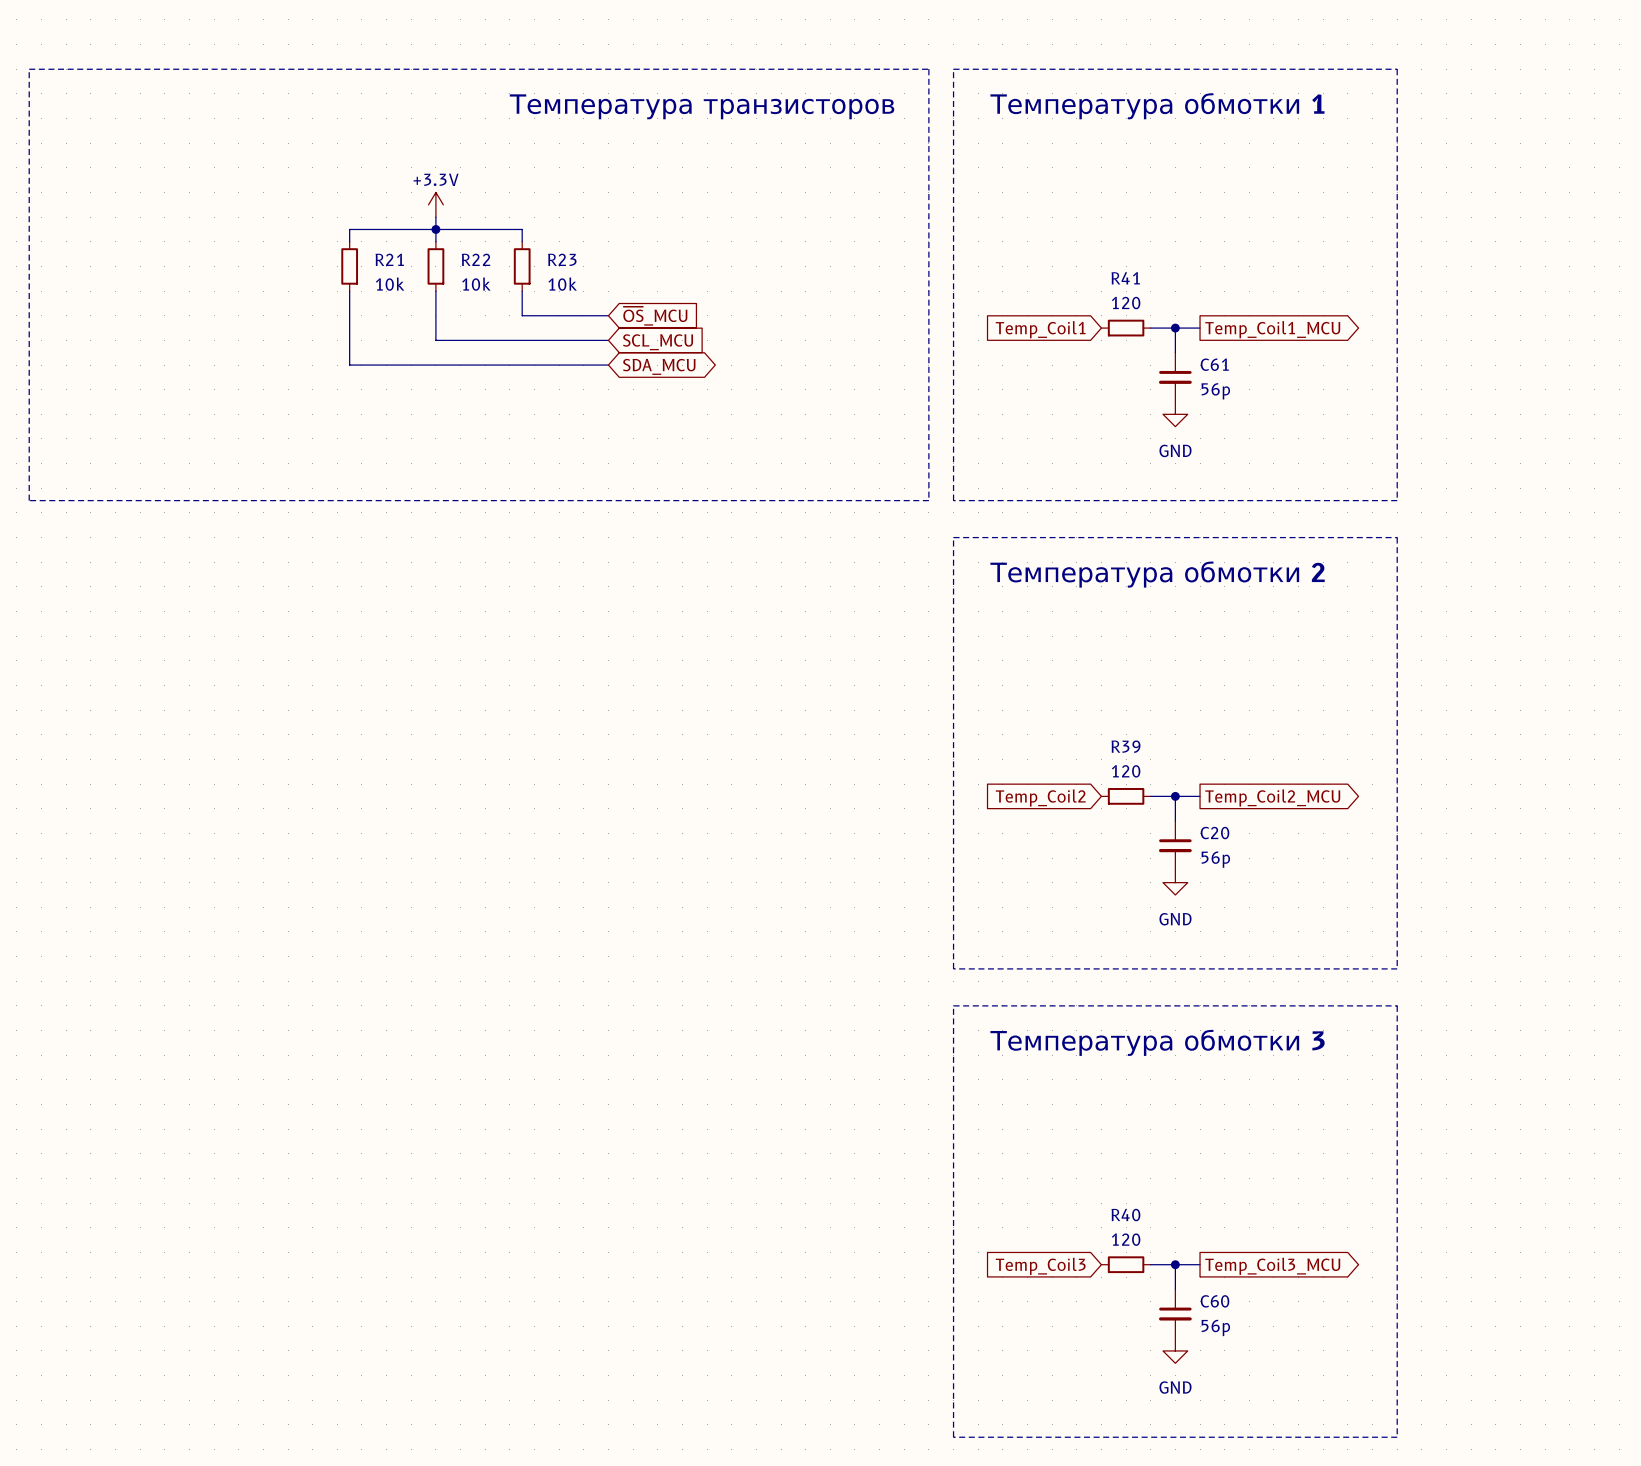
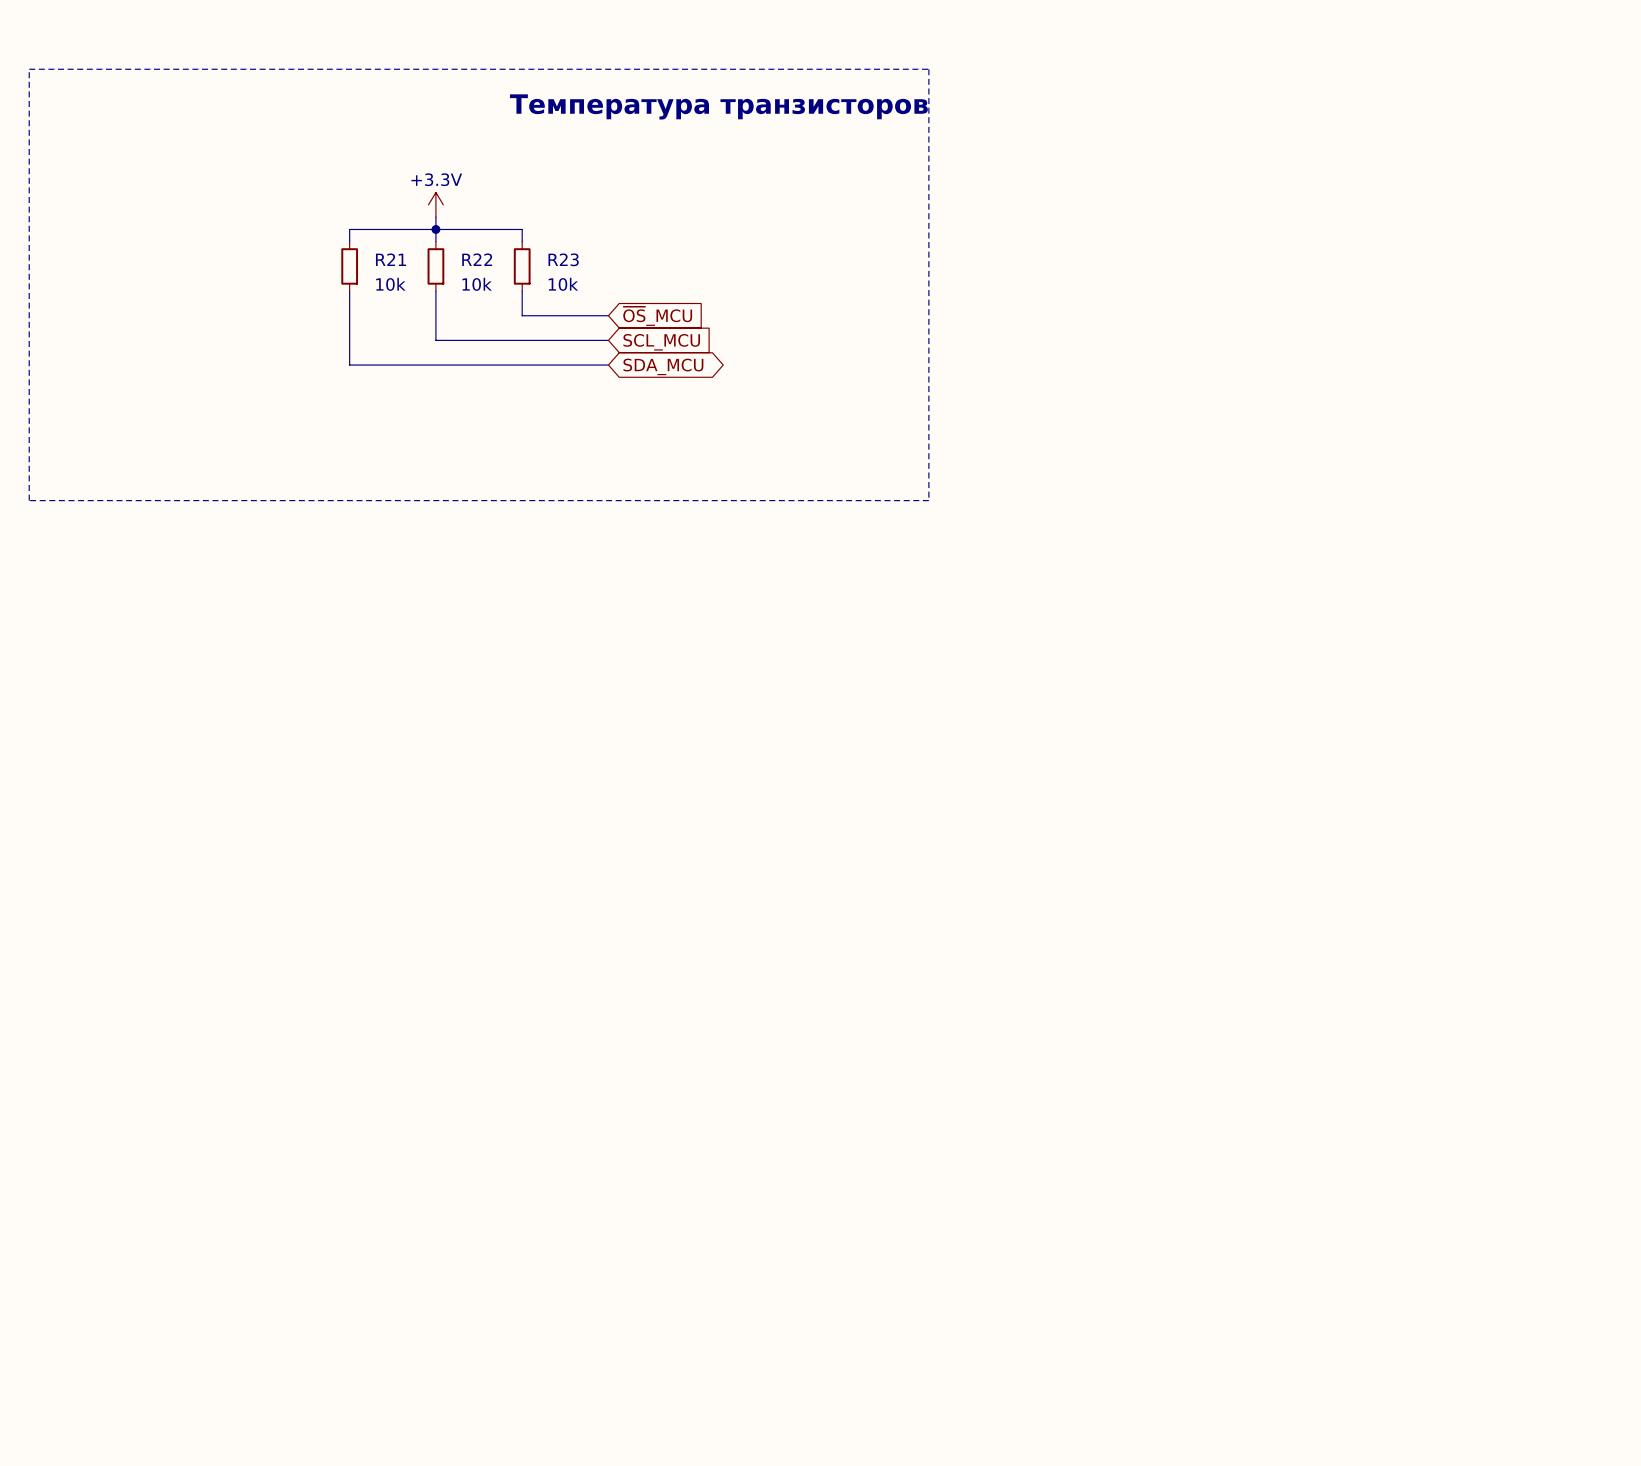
line: (953, 69) (1397, 69) (1397, 500) (953, 500) (953, 69) -> none
text: Температура обмотки 1 (1157, 106) -> none
R41: 120 (1126, 328) -> none
wire: (1150, 328) (1200, 328) -> none
wire: (1175, 328) (1175, 352) -> none
junction: (1175, 328) -> none
global label: Temp_Coil1 (1040, 329) -> none
global label: Temp_Coil1_MCU (1272, 329) -> none
C61: 56p (1175, 377) -> none
power symbol: GND (1175, 414) -> none
line: (953, 537) (953, 968) (1397, 968) (1397, 537) (953, 537) -> none
text: Температура обмотки 2 (1157, 574) -> none
R39: 120 (1126, 796) -> none
wire: (1150, 796) (1200, 796) -> none
wire: (1175, 796) (1175, 821) -> none
junction: (1175, 796) -> none
global label: Temp_Coil2 (1040, 798) -> none
global label: Temp_Coil2_MCU (1272, 798) -> none
C20: 56p (1175, 845) -> none
power symbol: GND (1175, 882) -> none
line: (953, 1005) (953, 1437) (1397, 1437) (1397, 1005) (953, 1005) -> none
text: Температура обмотки 3 (1157, 1042) -> none
R40: 120 (1126, 1264) -> none
wire: (1150, 1264) (1200, 1264) -> none
wire: (1175, 1264) (1175, 1289) -> none
junction: (1175, 1264) -> none
global label: Temp_Coil3 (1040, 1266) -> none
global label: Temp_Coil3_MCU (1272, 1266) -> none
C60: 56p (1175, 1314) -> none
power symbol: GND (1175, 1350) -> none

